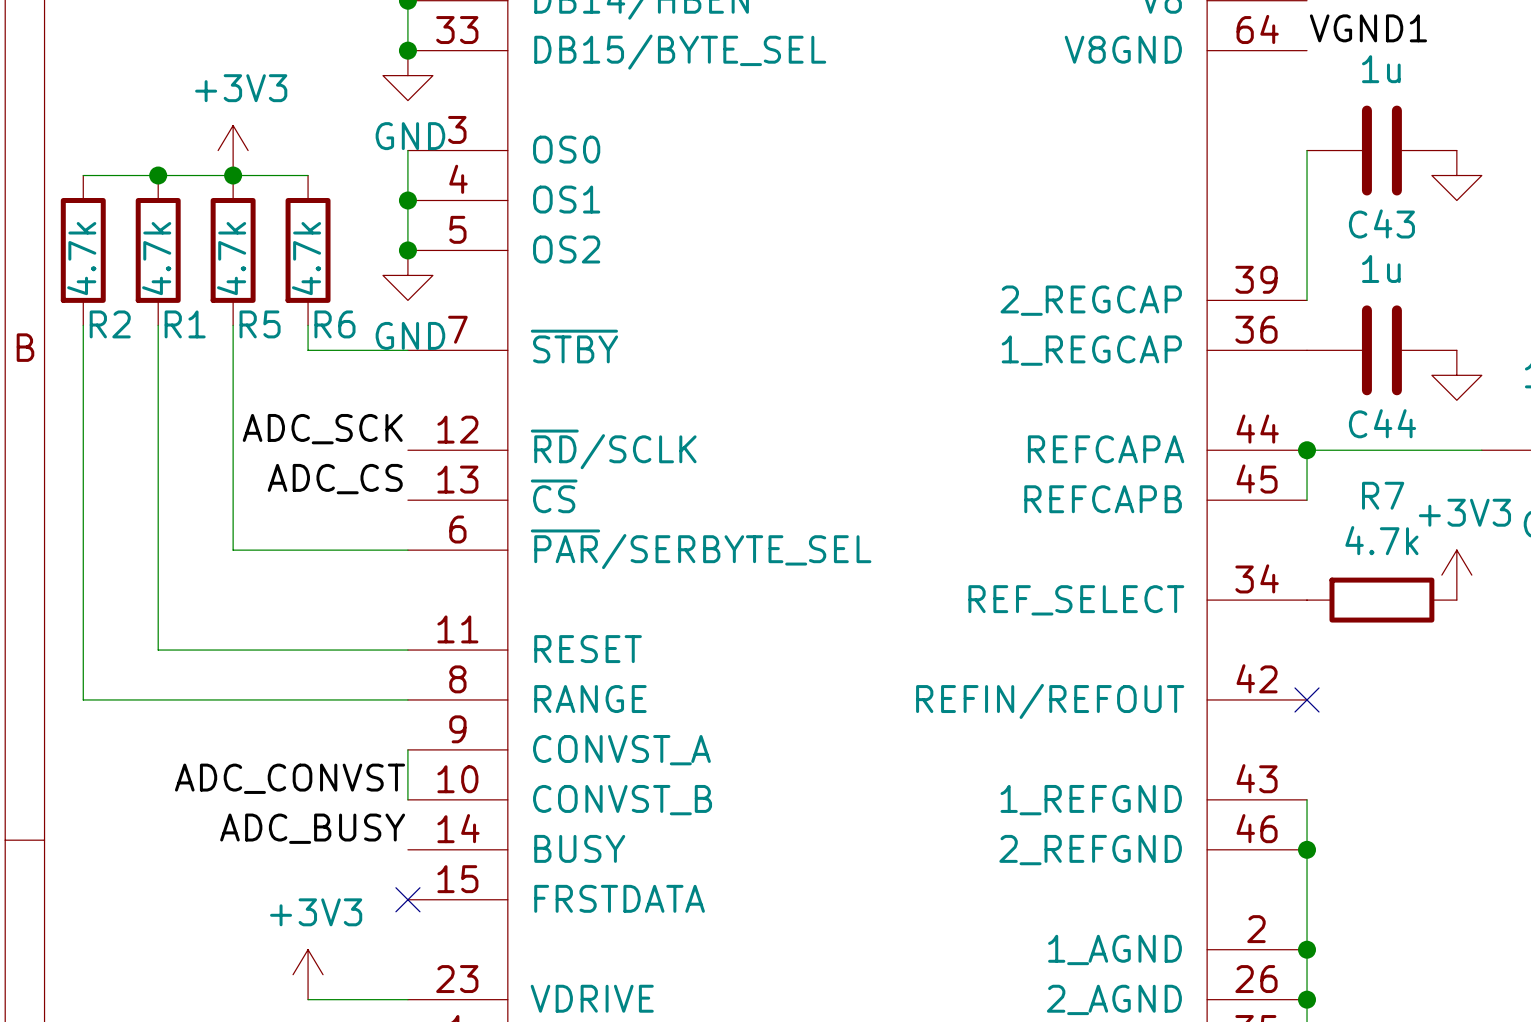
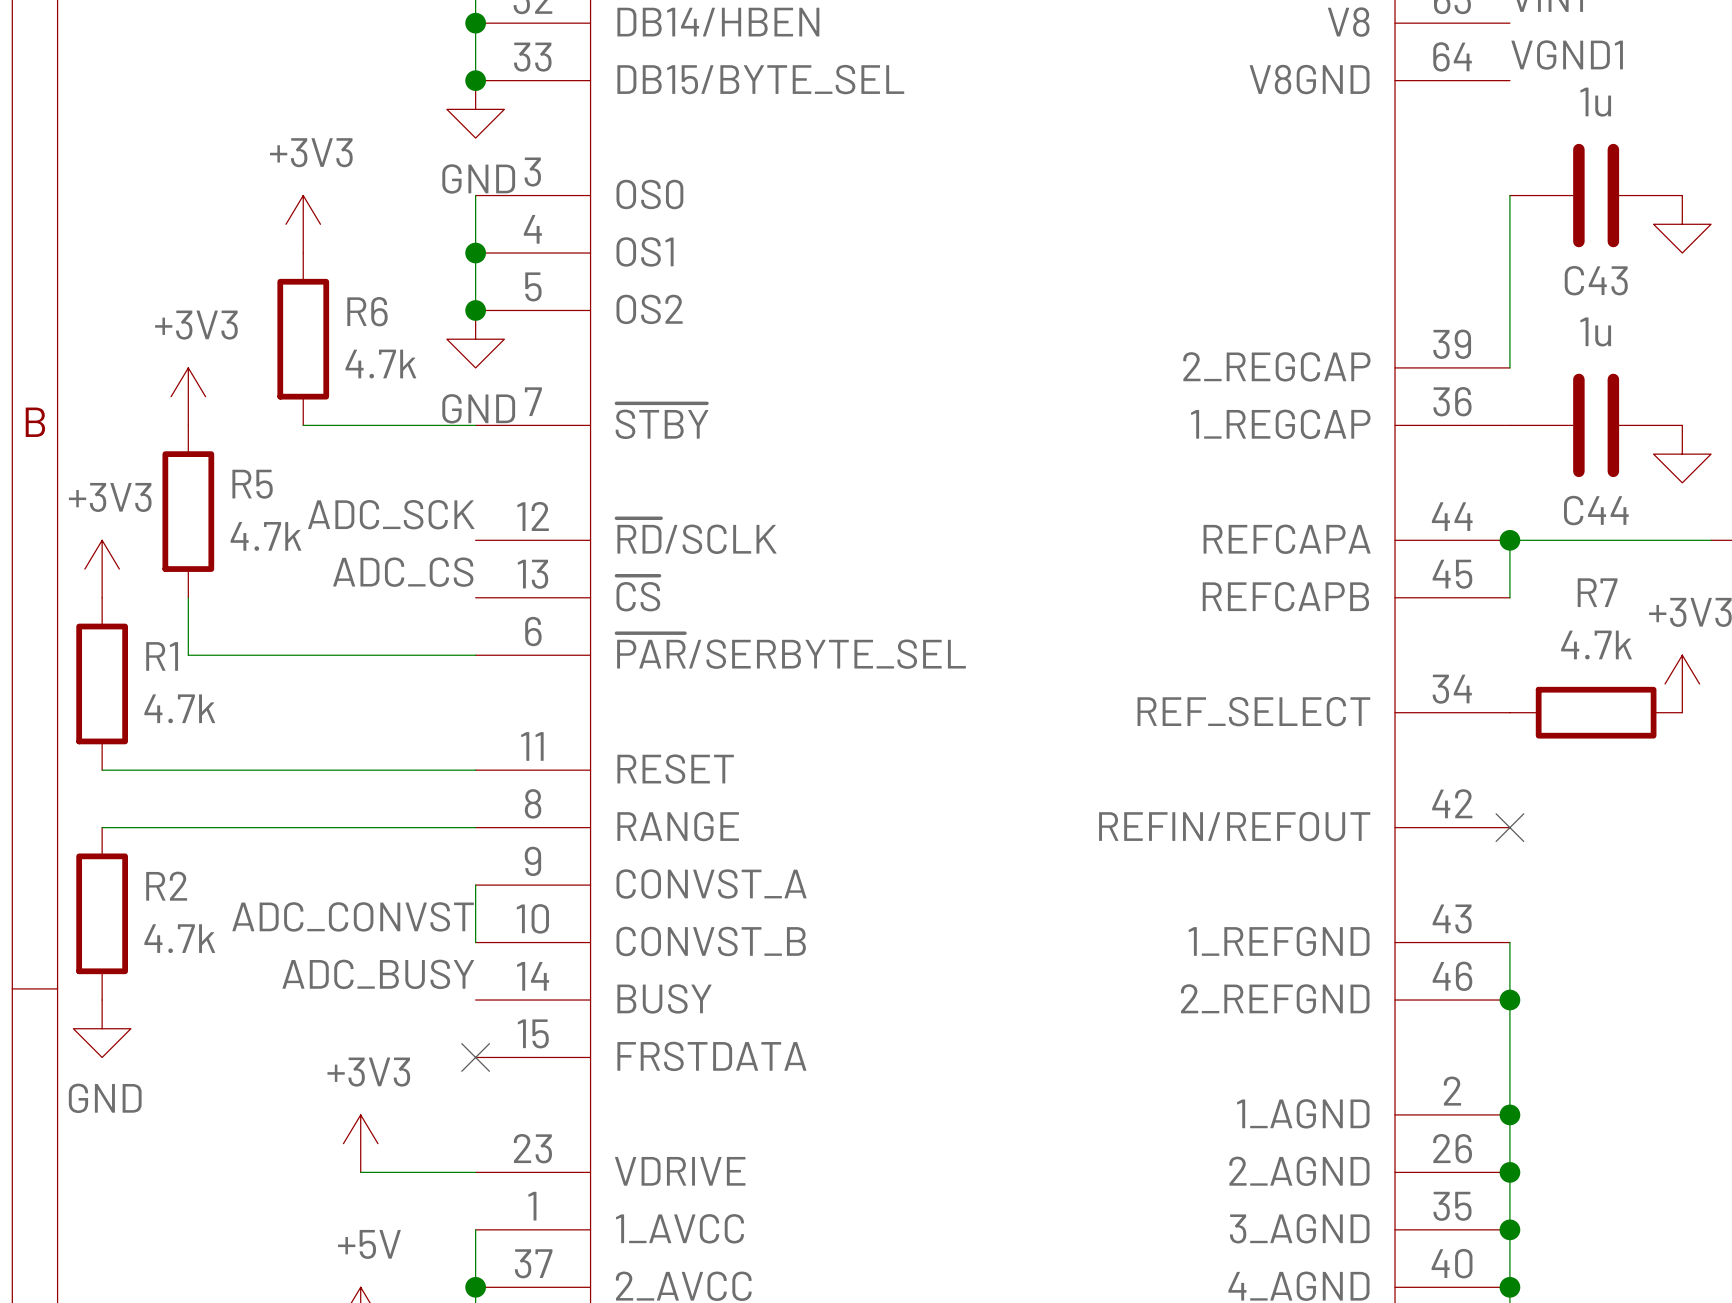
power symbol position: +3V3 (233, 150) -> +3V3 (303, 224)
wire: (83, 175) (308, 175) -> none
junction: (158, 175) -> none
junction: (233, 175) -> none
R2 position: (83, 250) -> (102, 913)
R1 position: (158, 250) -> (102, 683)
R5 position: (233, 250) -> (188, 511)
R6 position: (308, 250) -> (303, 339)
R2 value rotation: 0° (81, 258) -> 90° clockwise (179, 938)
R1 value rotation: 0° (156, 258) -> 90° clockwise (179, 708)
R5 value rotation: 0° (231, 258) -> 90° clockwise (265, 536)
R6 value rotation: 0° (306, 258) -> 90° clockwise (380, 364)
R2 name position: R2 (110, 324) -> R2 (166, 886)
R1 name position: R1 (185, 324) -> R1 (162, 656)
R5 name position: R5 (260, 324) -> R5 (252, 484)
R6 name position: R6 (334, 324) -> R6 (367, 311)
wire: (83, 325) (83, 699) -> none
wire: (158, 325) (158, 500) -> none
power symbol: none -> +3V3 (188, 396)
wire: (233, 325) (233, 550) -> none
wire: (308, 325) (308, 350) -> (303, 425) (360, 425)
power symbol: none -> +3V3 (102, 569)
wire: (158, 550) (158, 650) -> (188, 655) (274, 655)
wire: none -> (102, 770) (188, 770)
power symbol: none -> GND (102, 1028)

